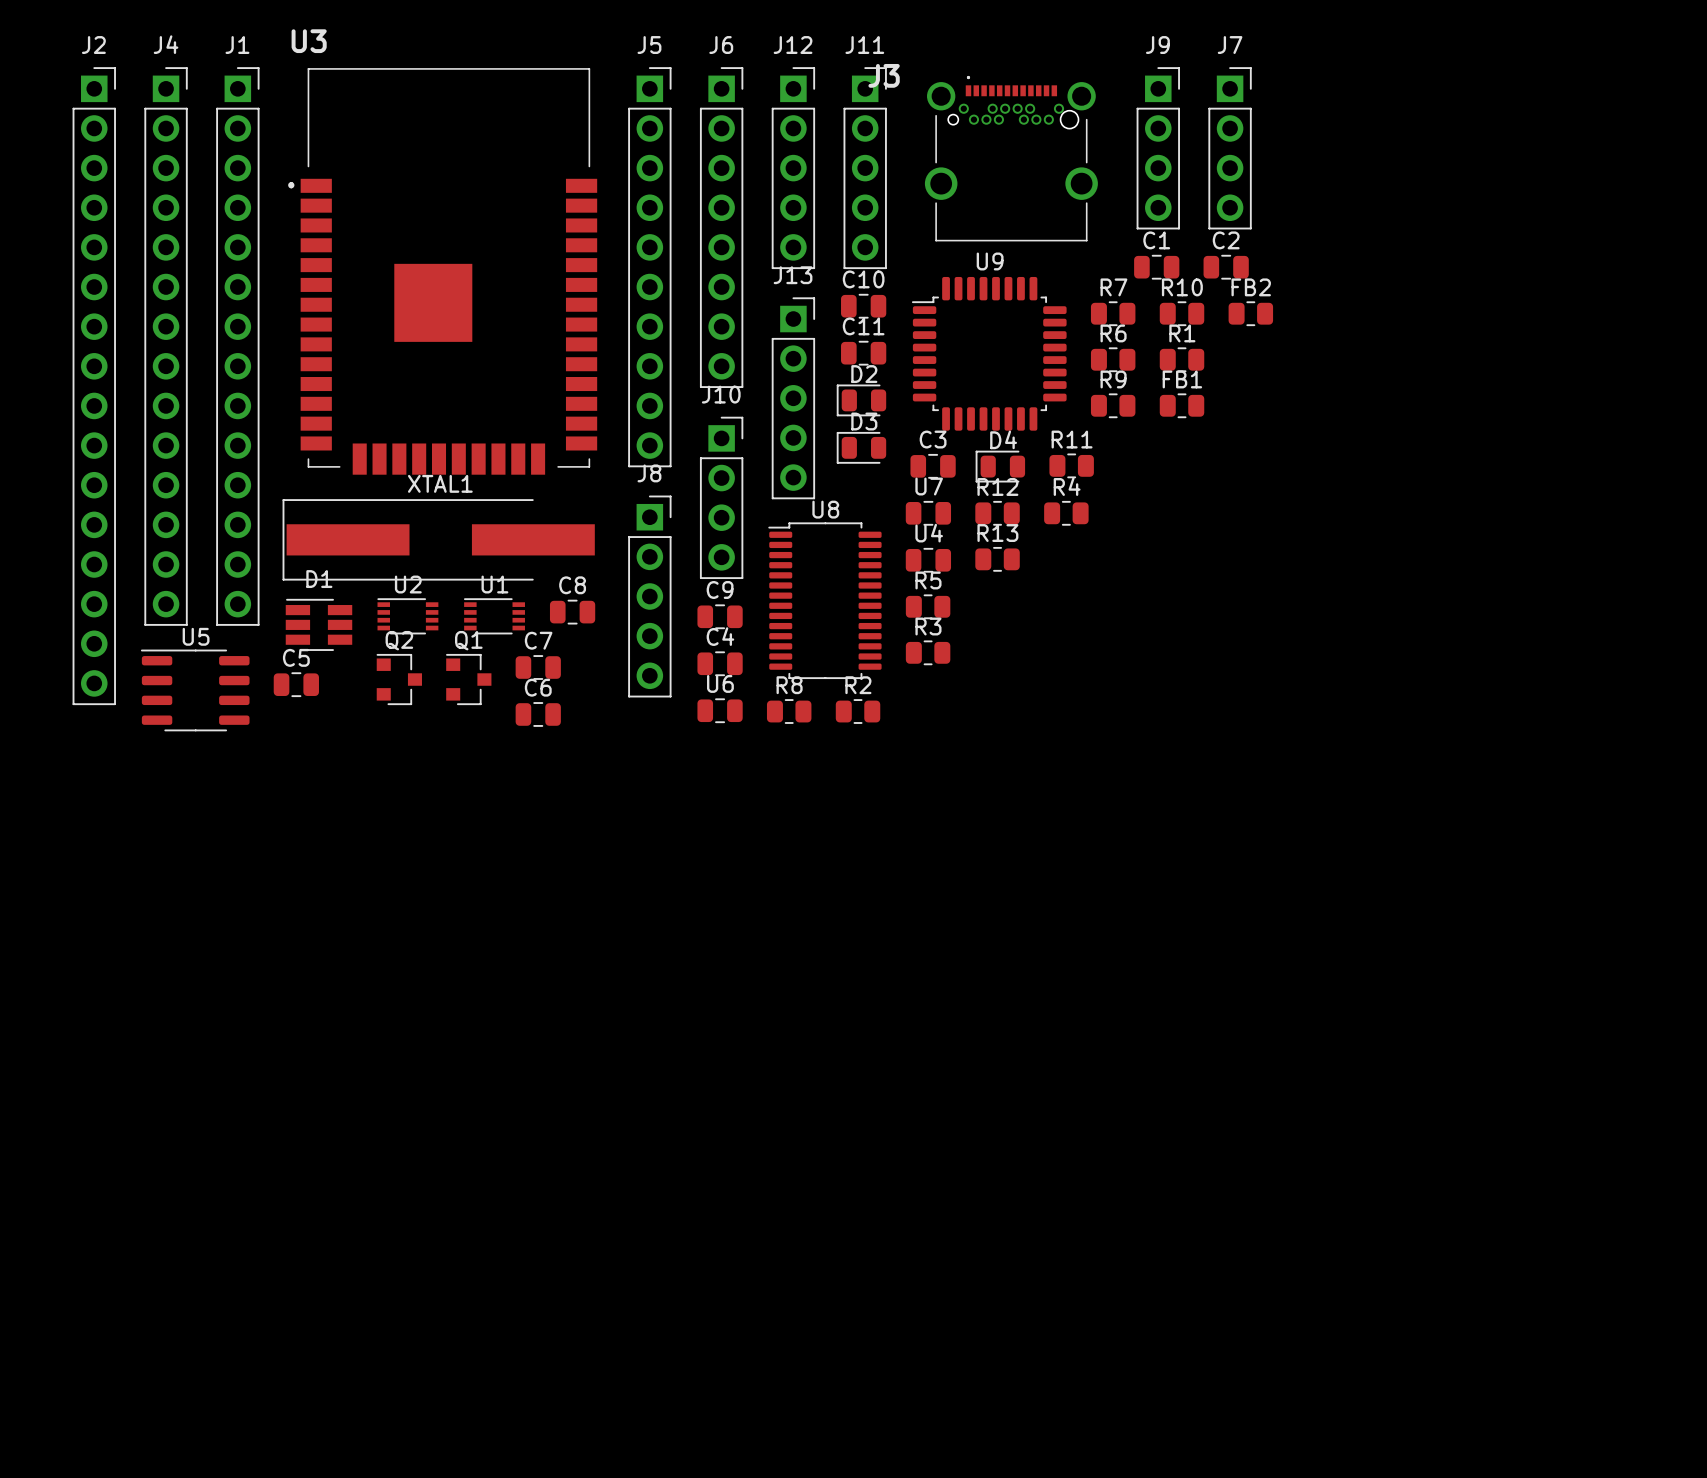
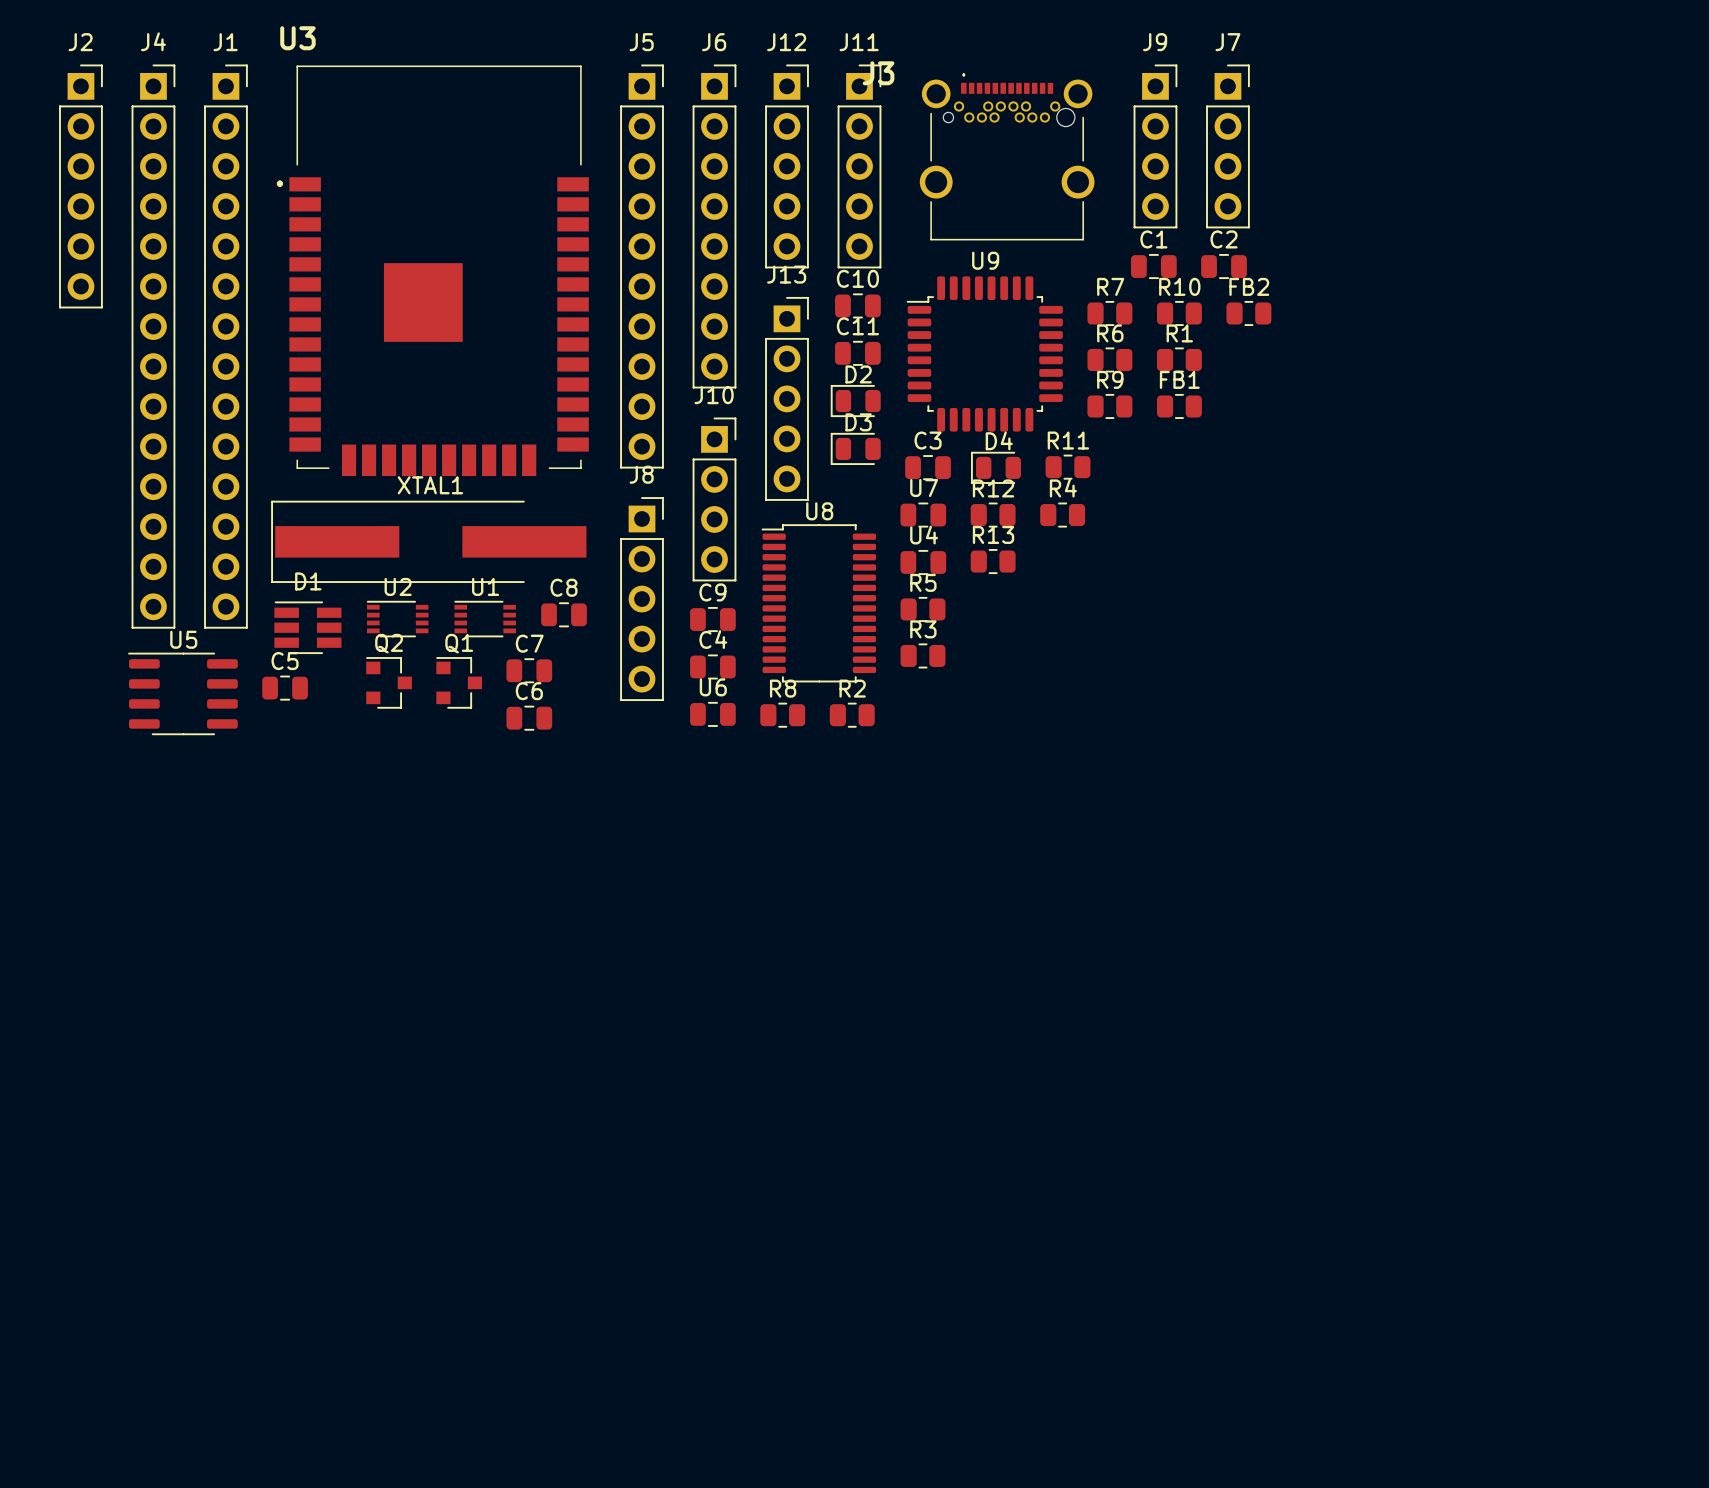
J2 footprint: [72, 67, 116, 706] -> [59, 64, 103, 309]

